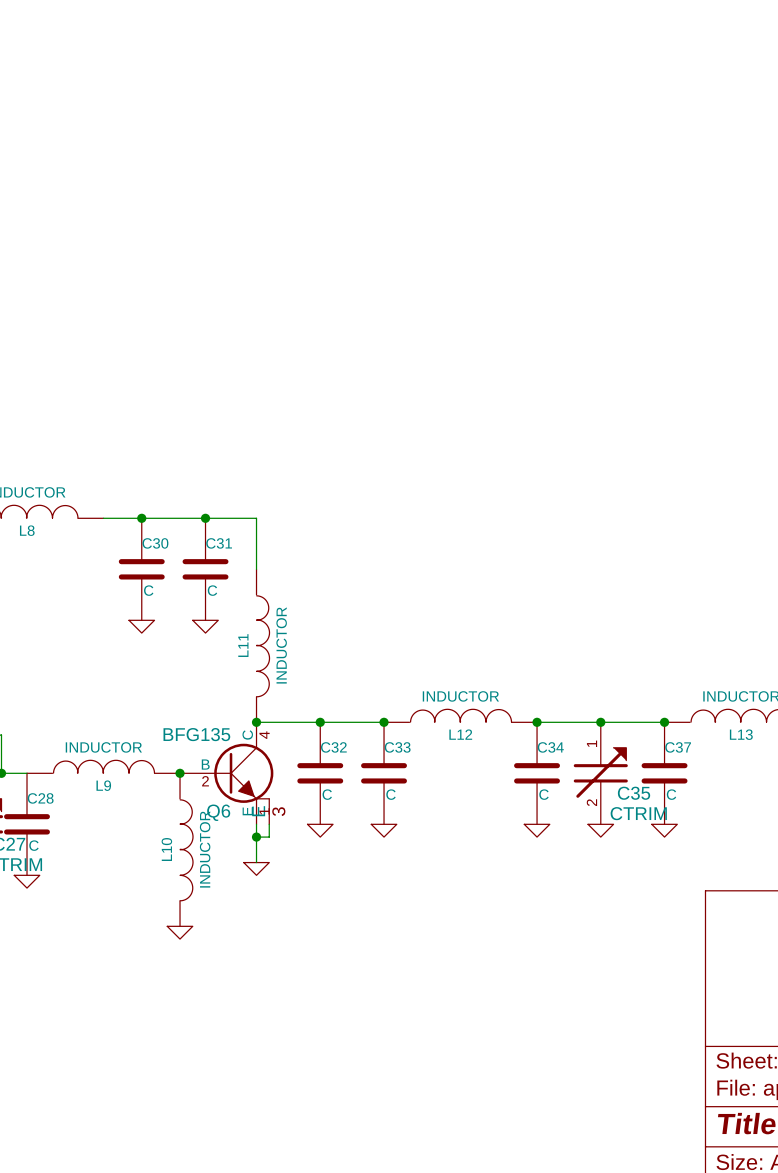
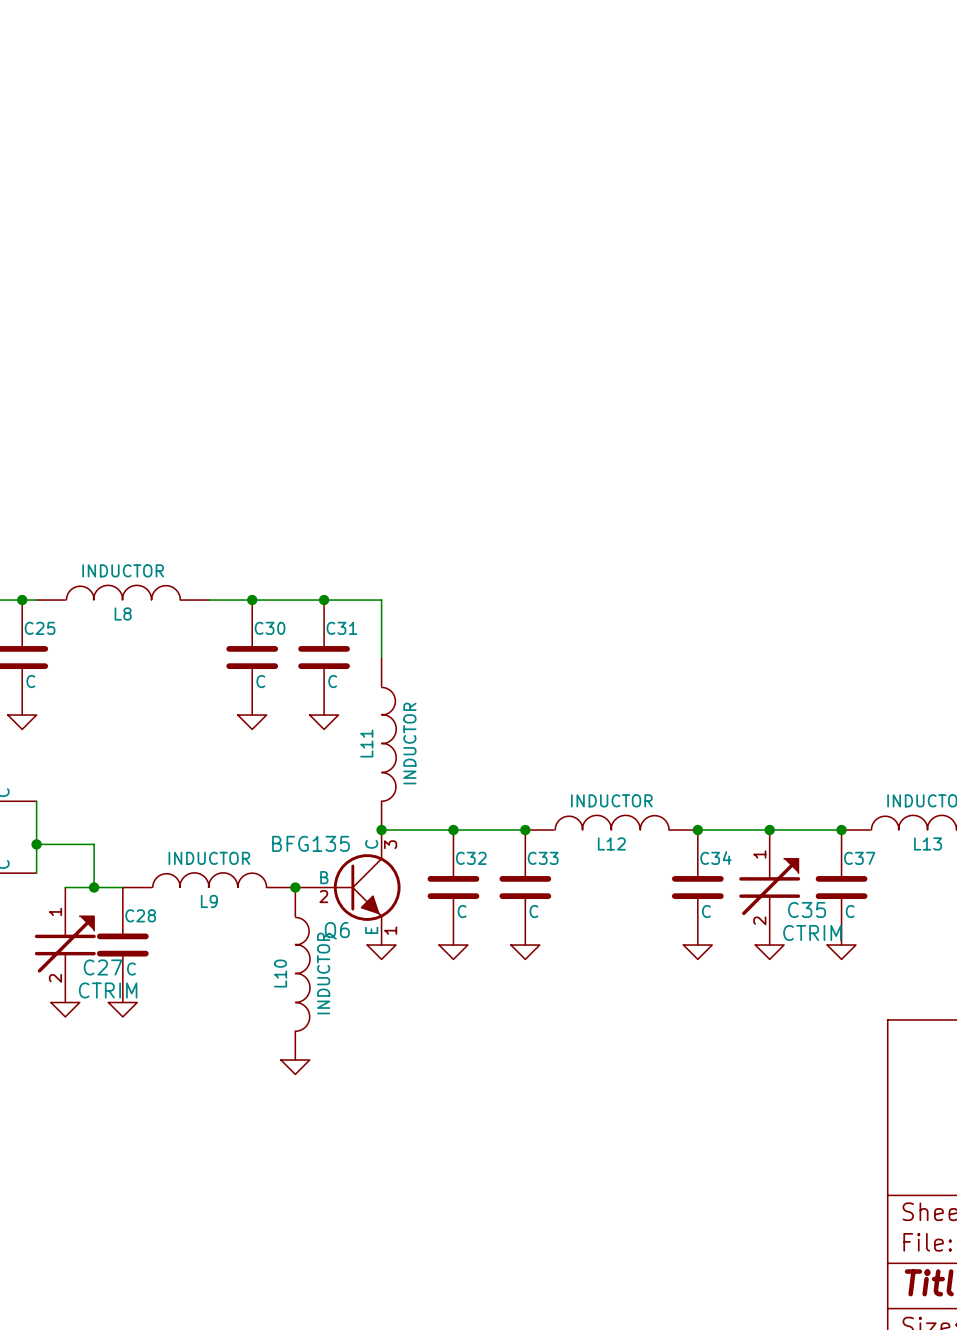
Q6 symbol: [180, 722, 274, 825] -> [295, 830, 401, 946]
wire: (256, 824) (256, 862) -> none
wire: (269, 824) (269, 837) (256, 837) -> none
junction: (256, 837) -> none
power symbol position: (256, 868) -> (381, 952)

